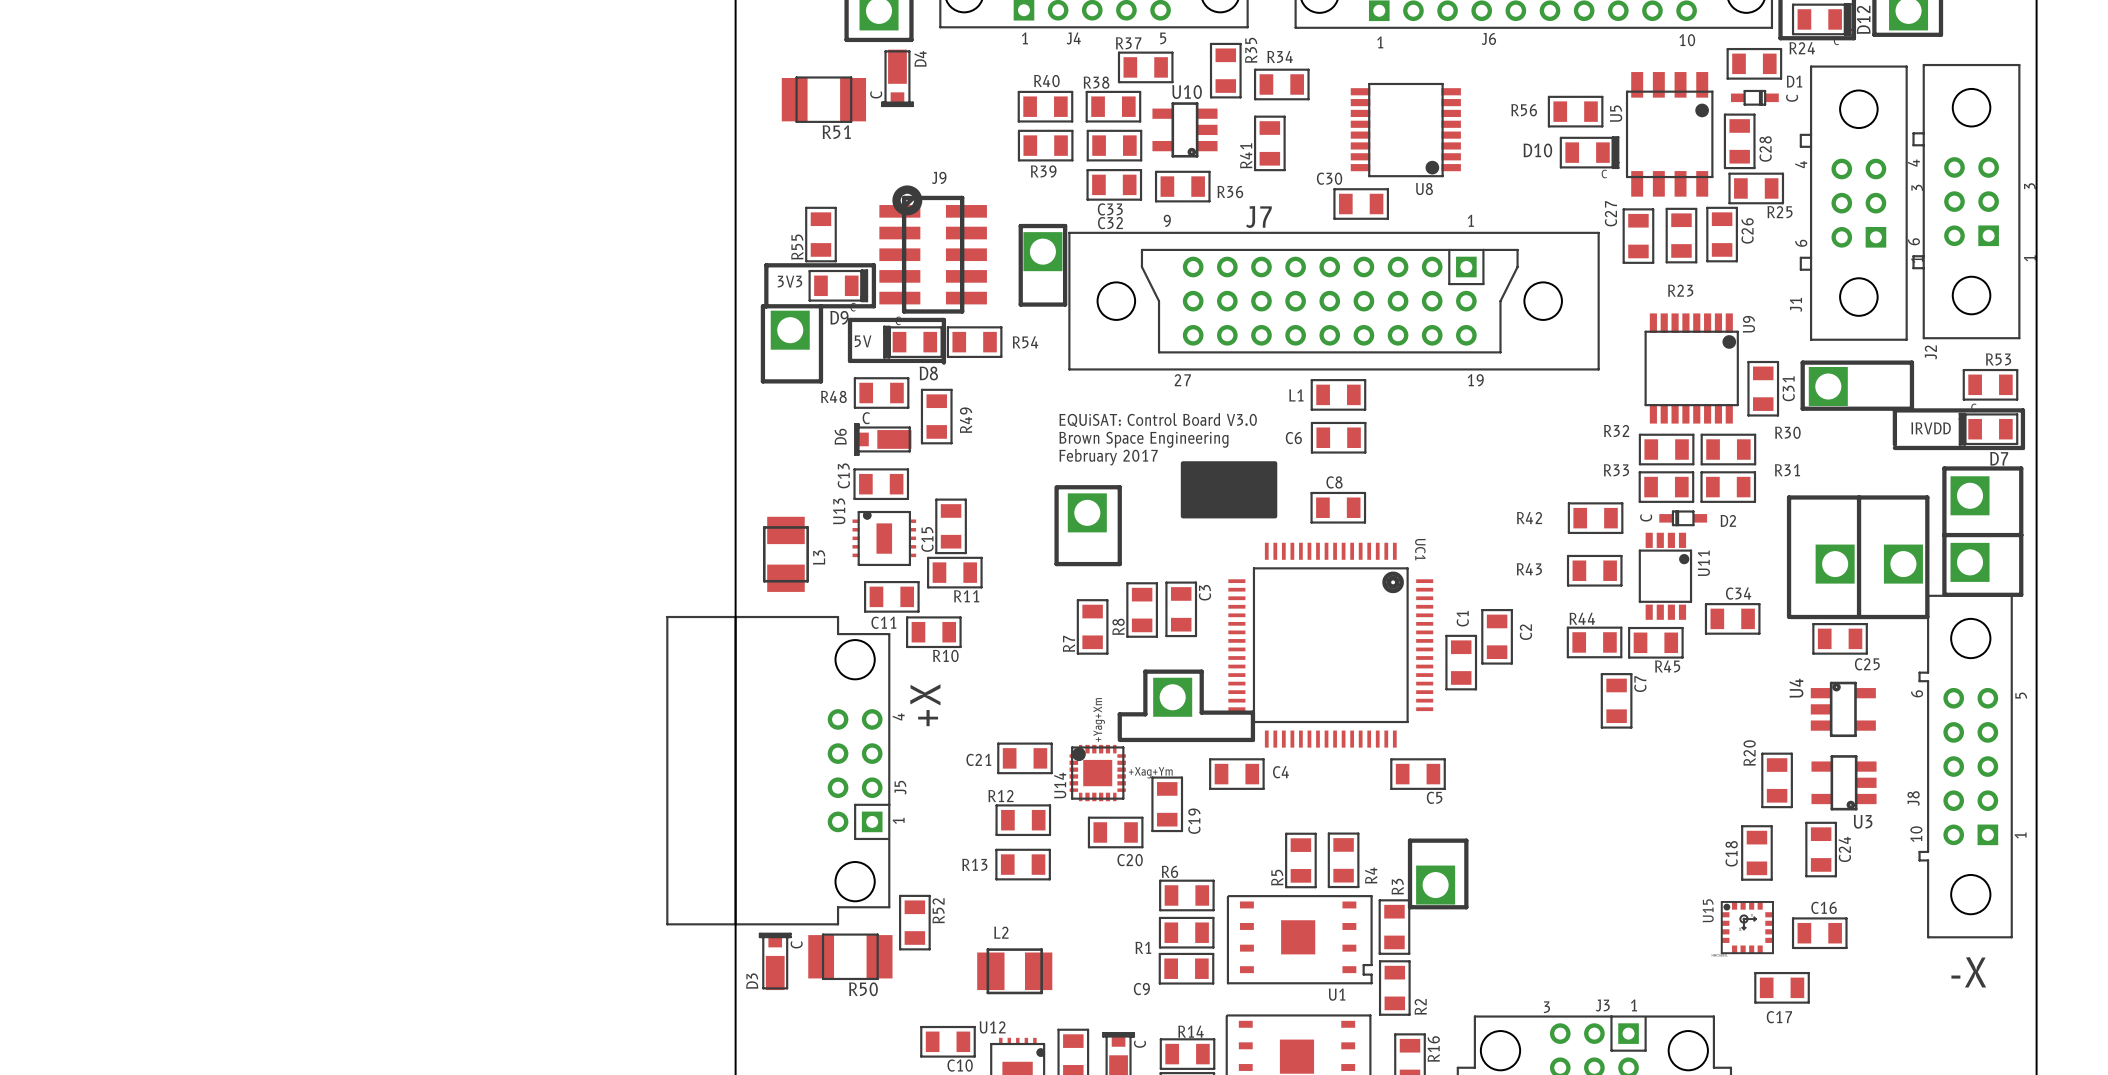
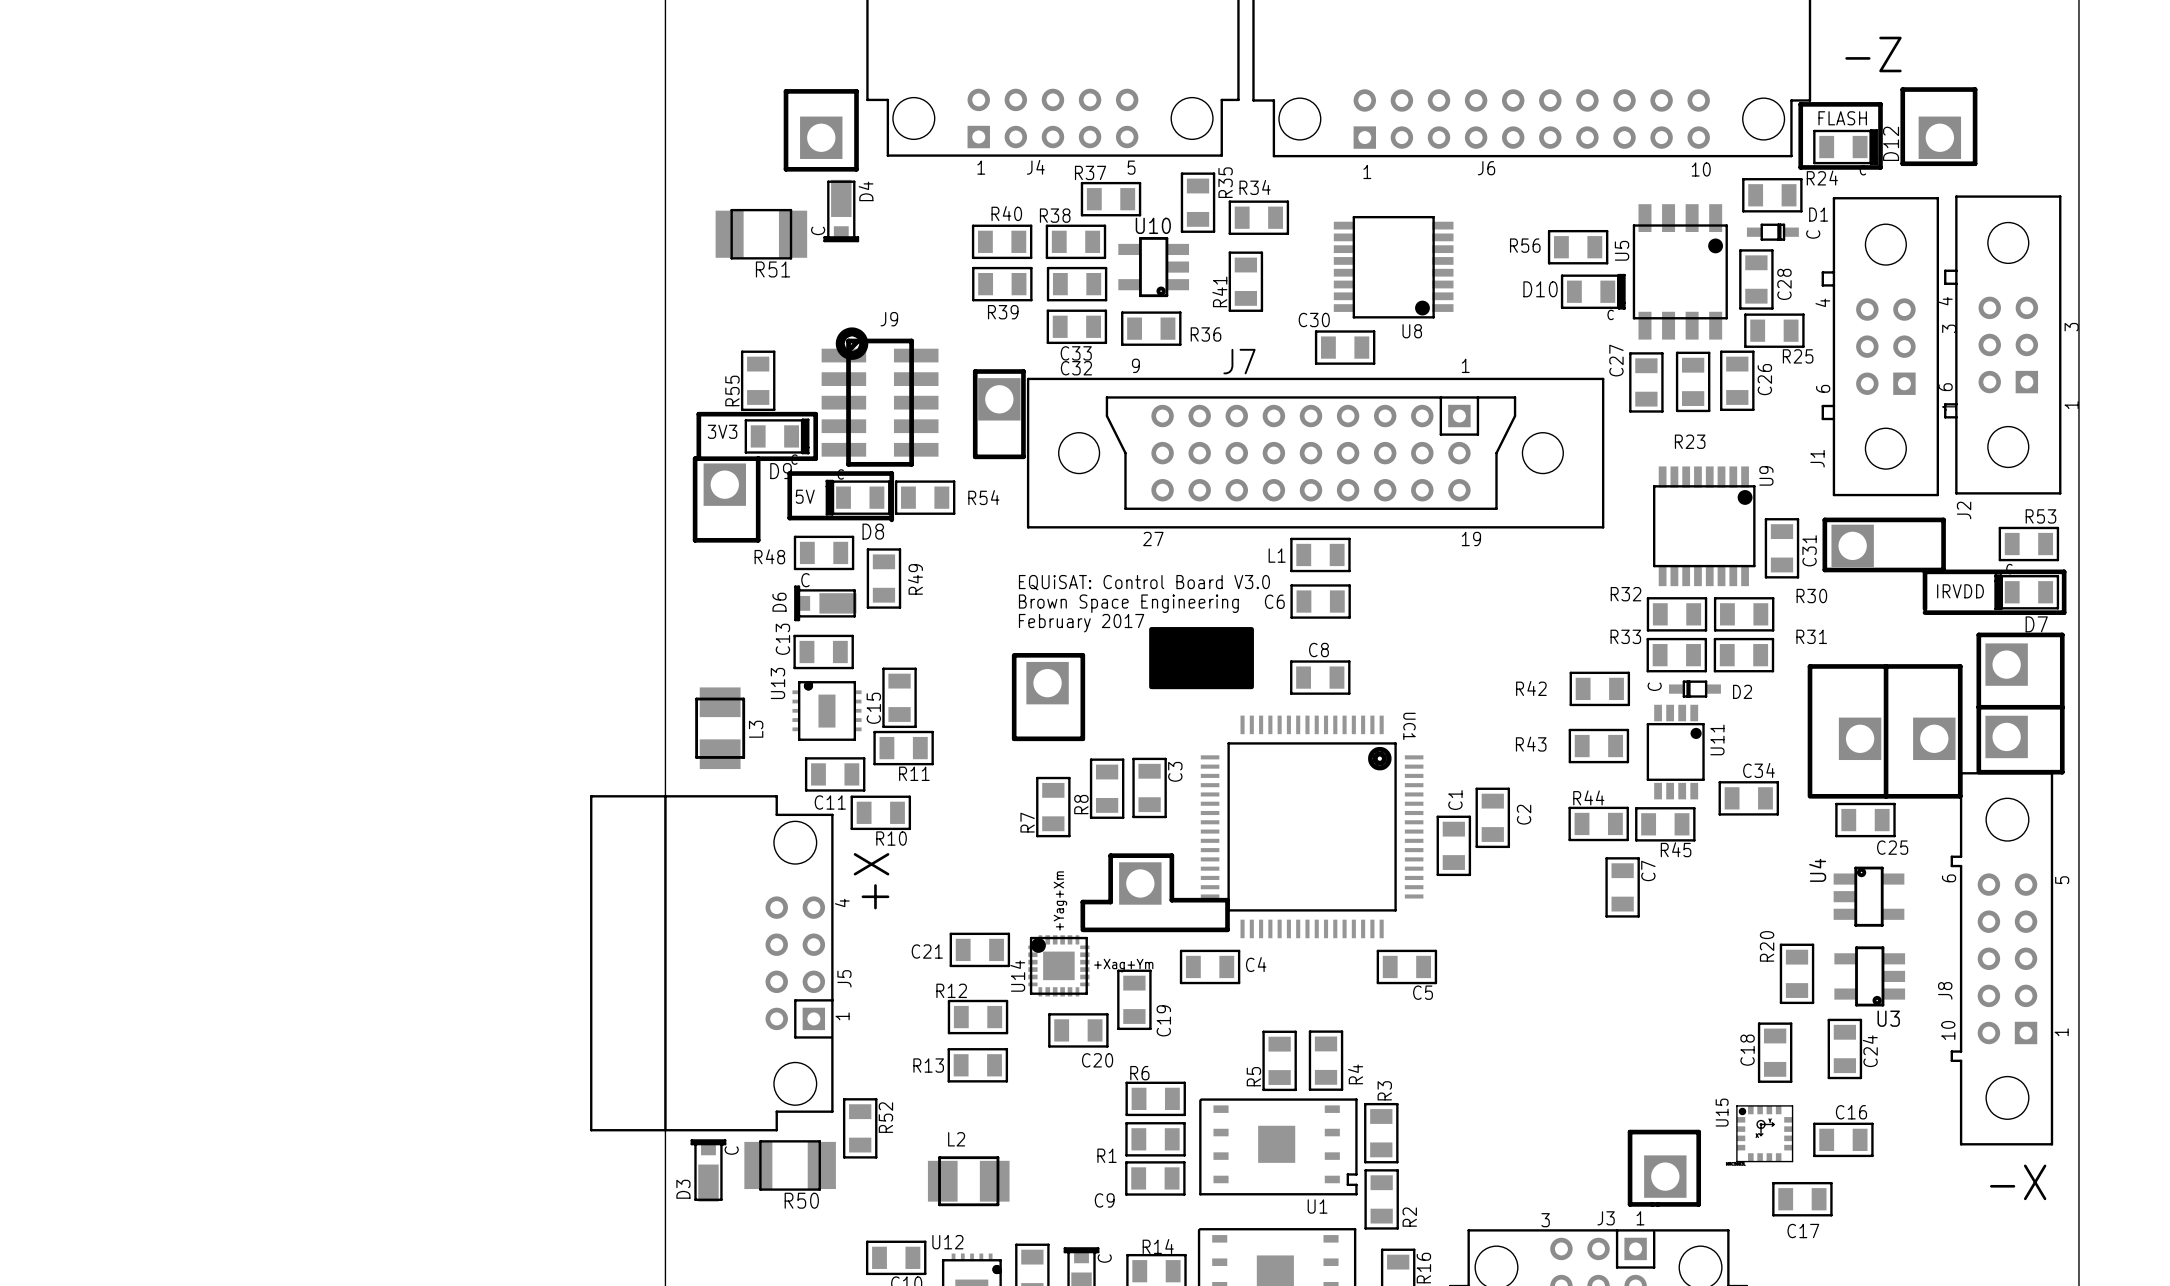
part position: (1435, 885) -> (1665, 1176)
line: (1413, 907) (1410, 907) (1410, 840) (1466, 840) (1466, 907) (1415, 907) -> none
line: none -> (1630, 1132) (1698, 1132) (1698, 1204) (1630, 1204) (1630, 1132)

